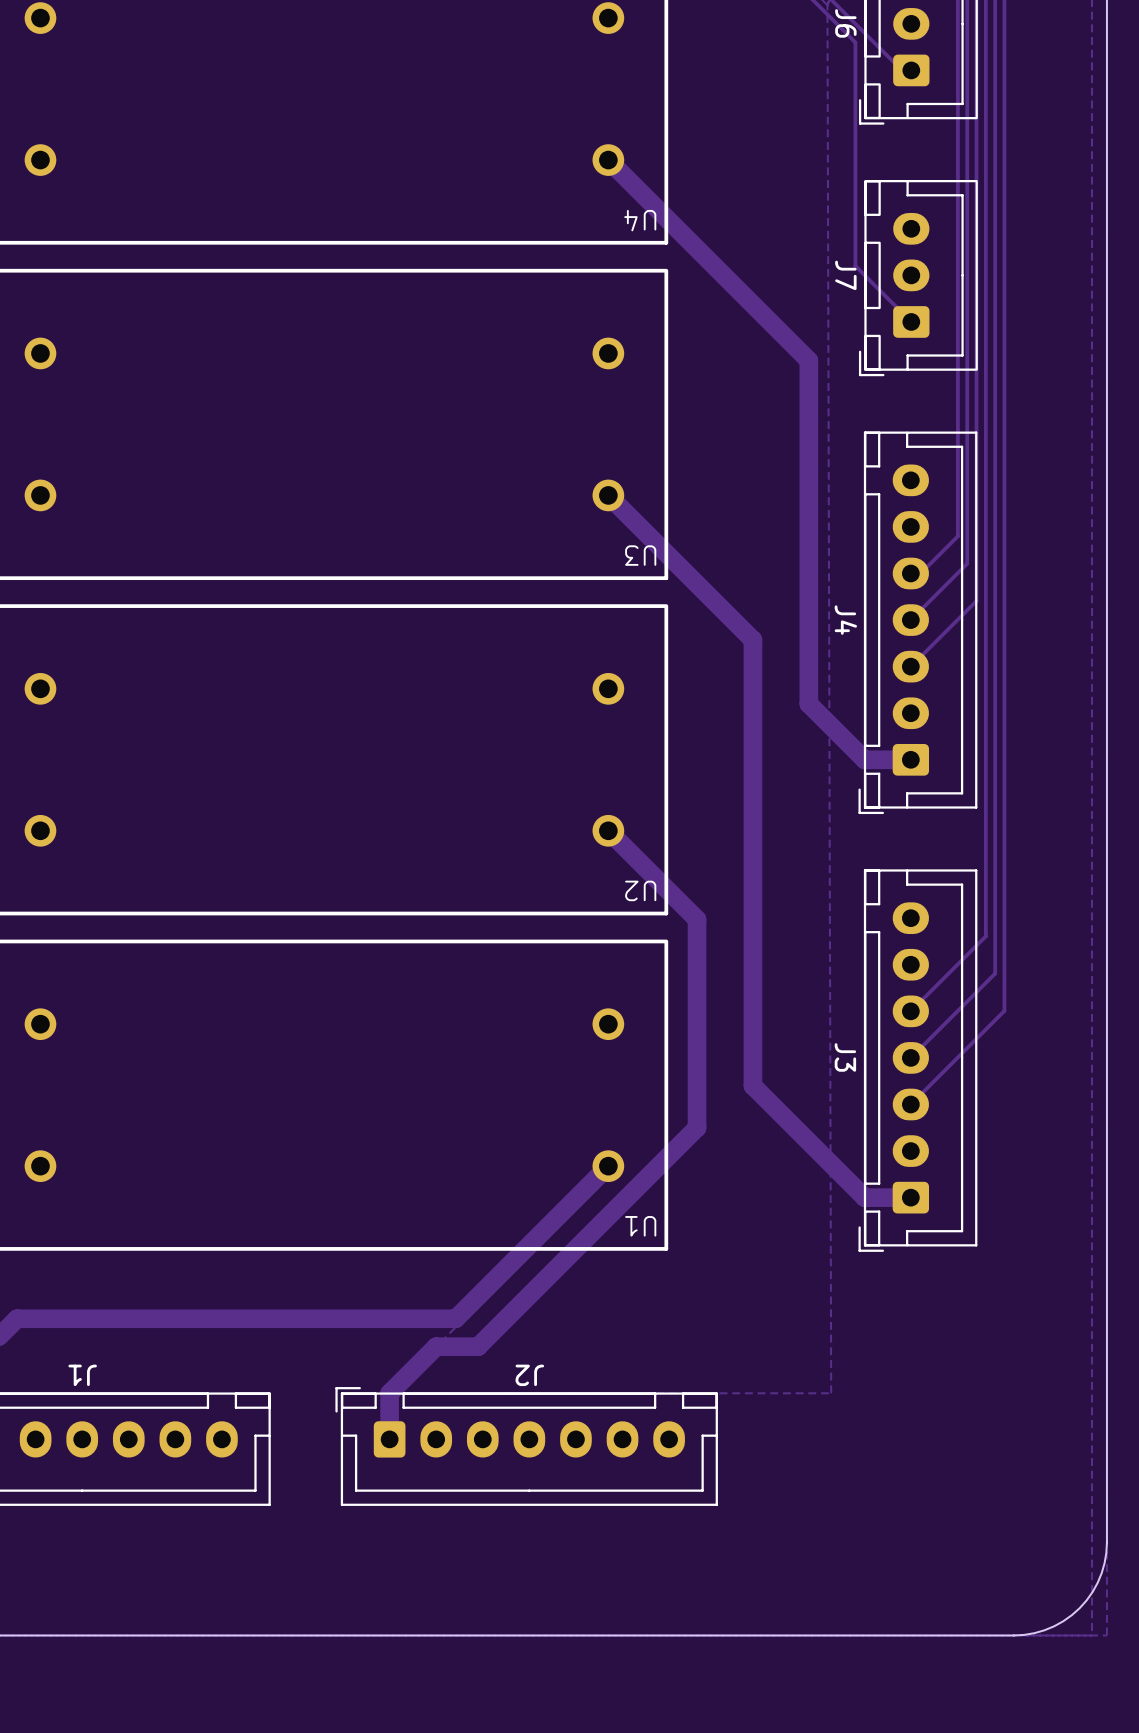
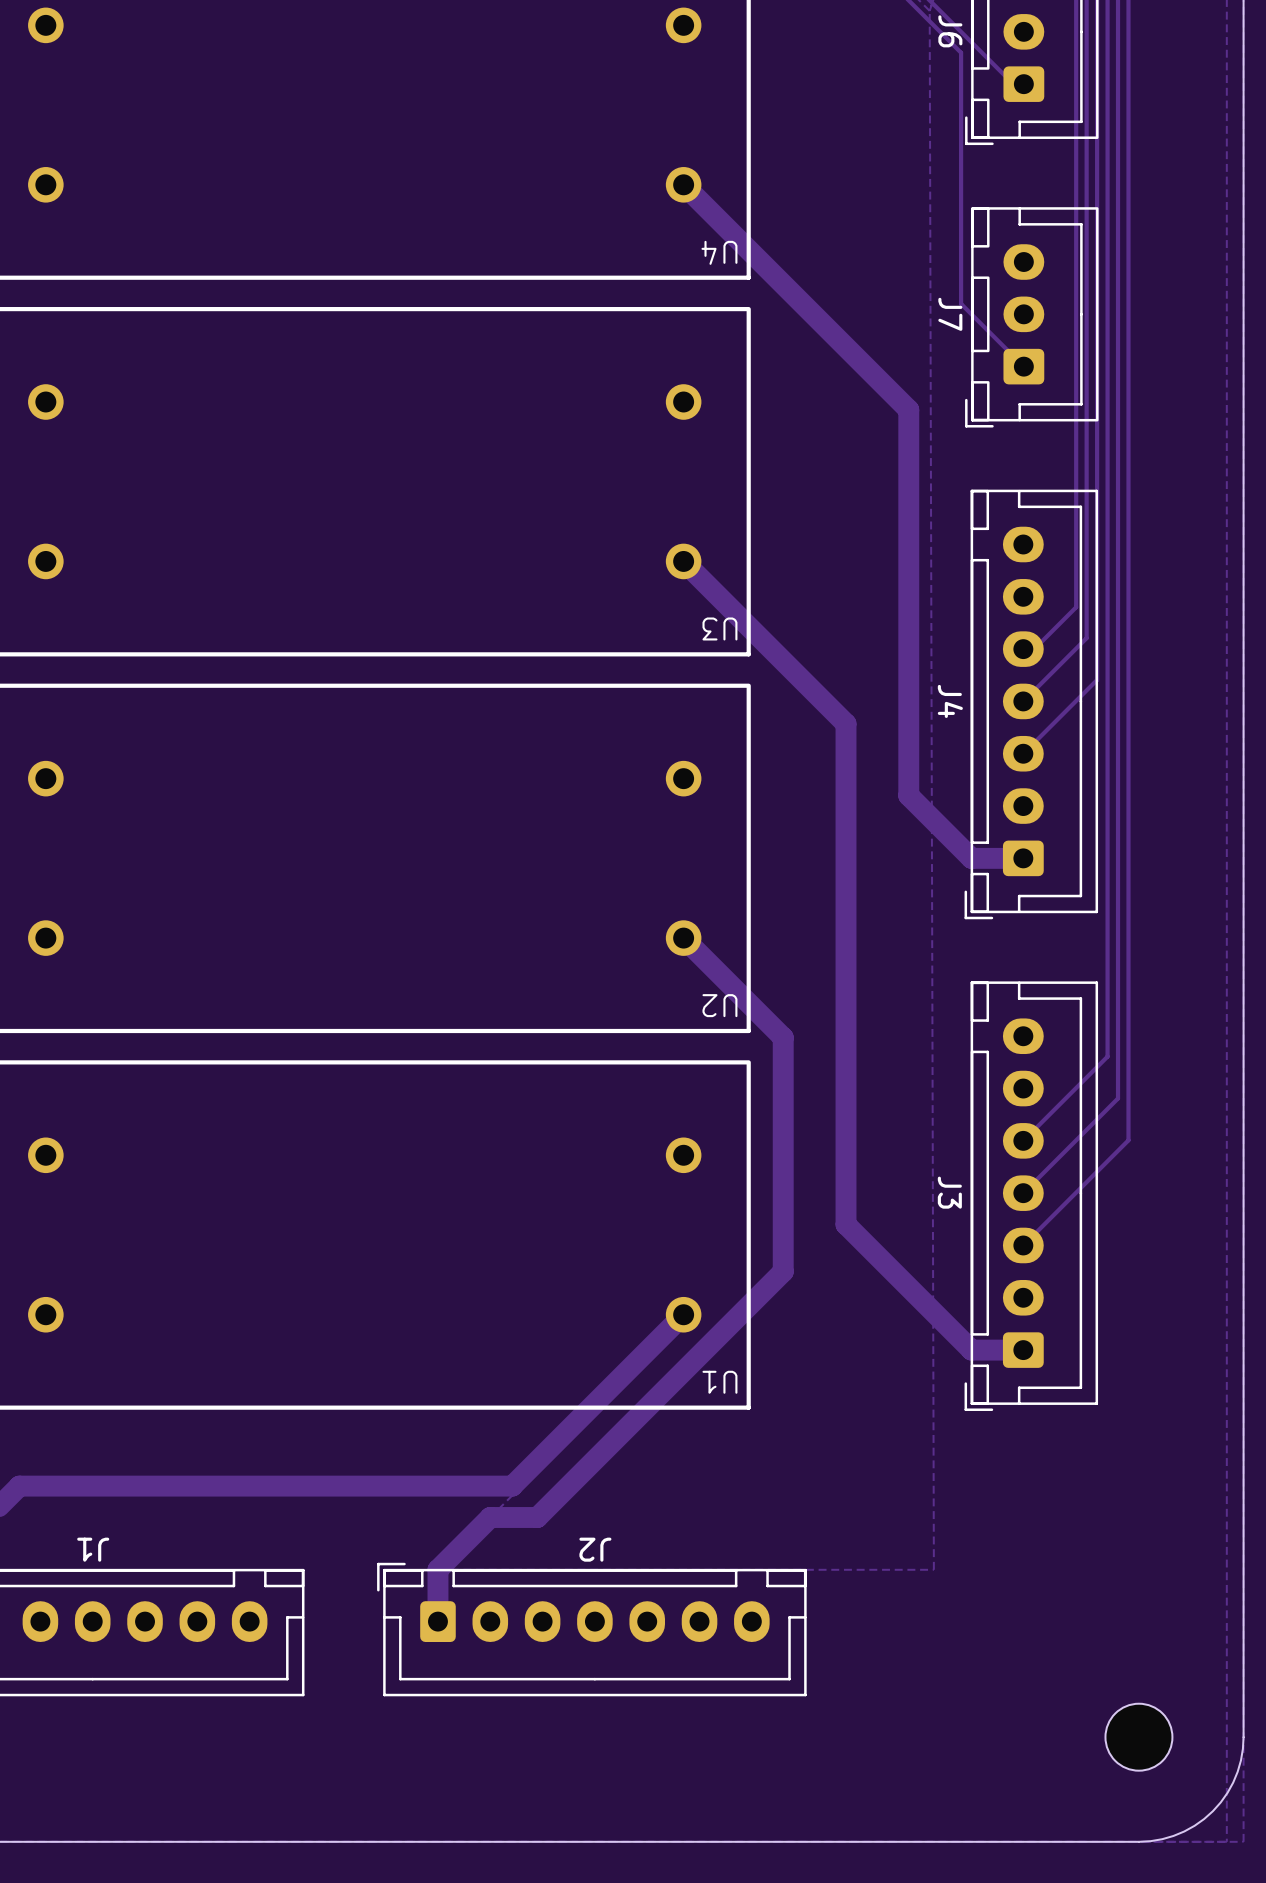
part: none -> (1138, 1737)

